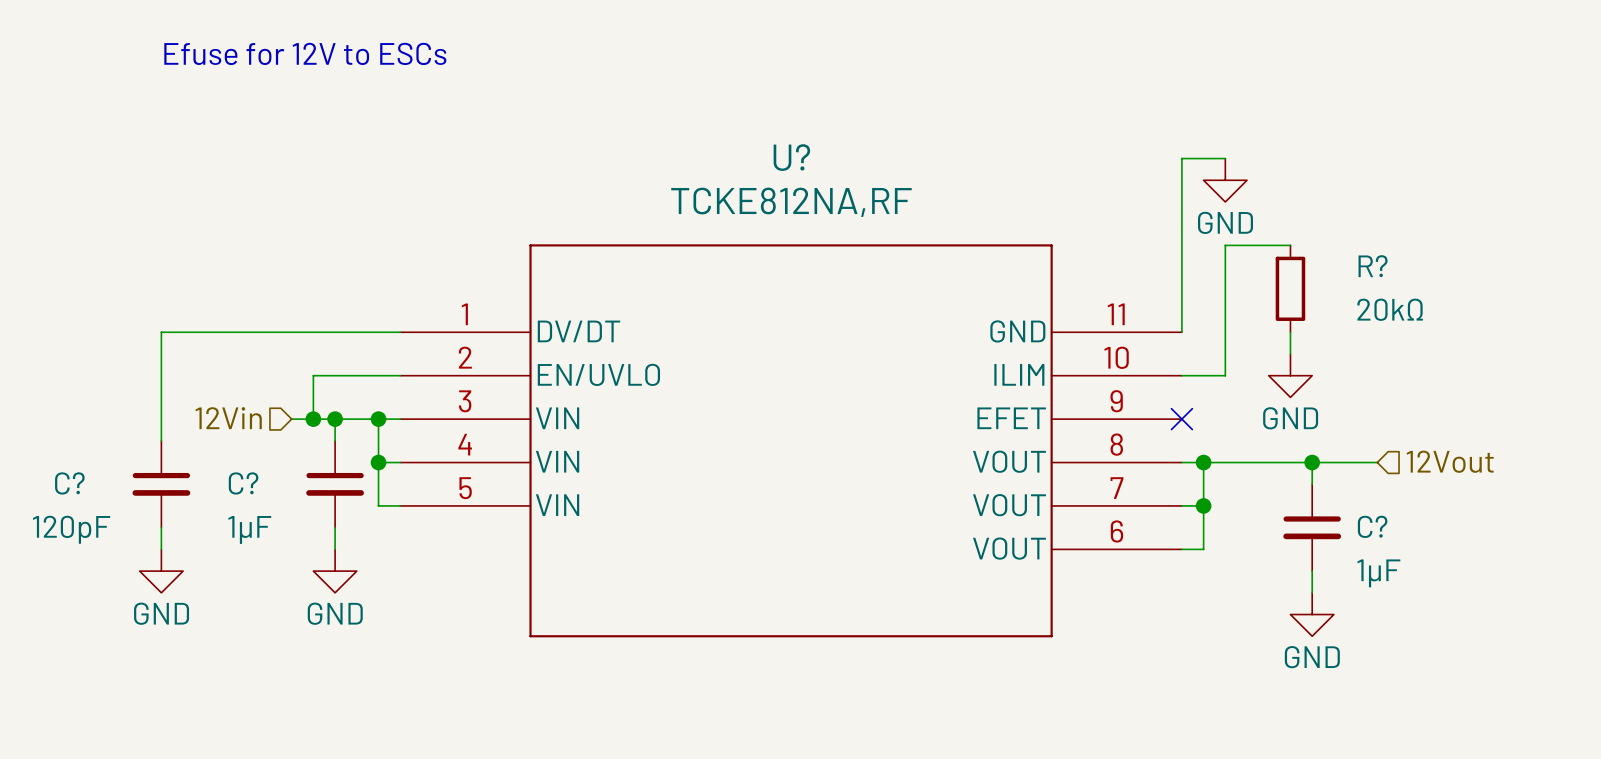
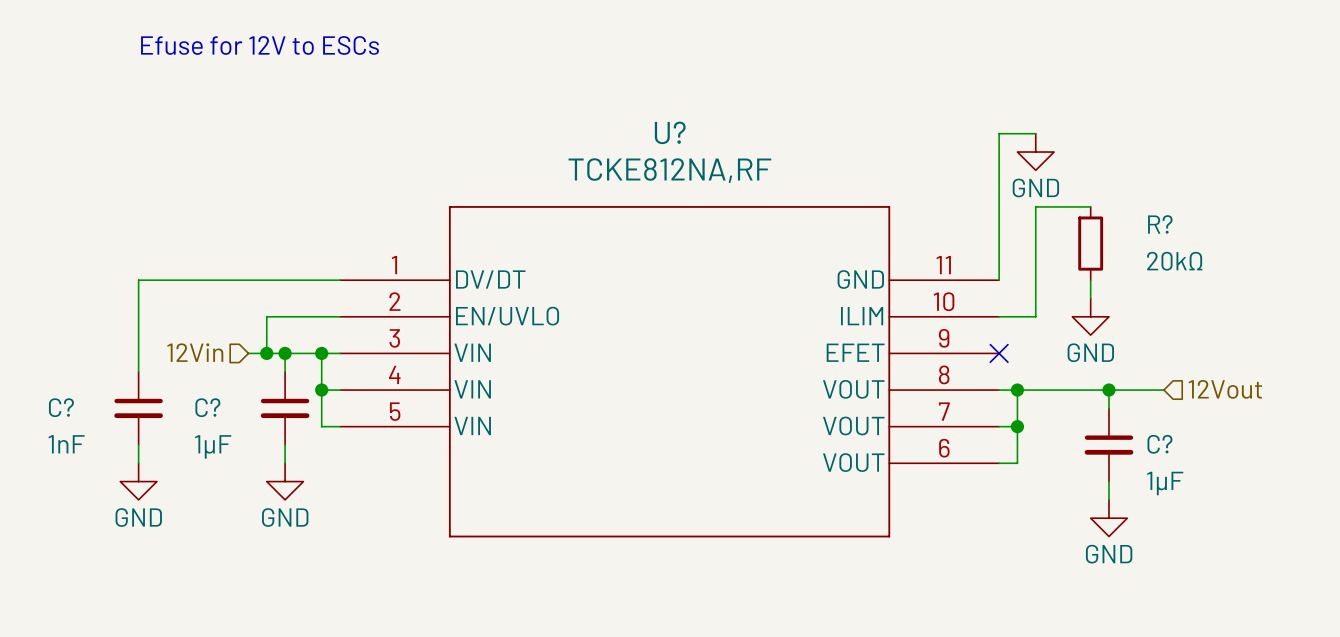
C? value: 120pF (71, 529) -> 1nF (66, 444)

